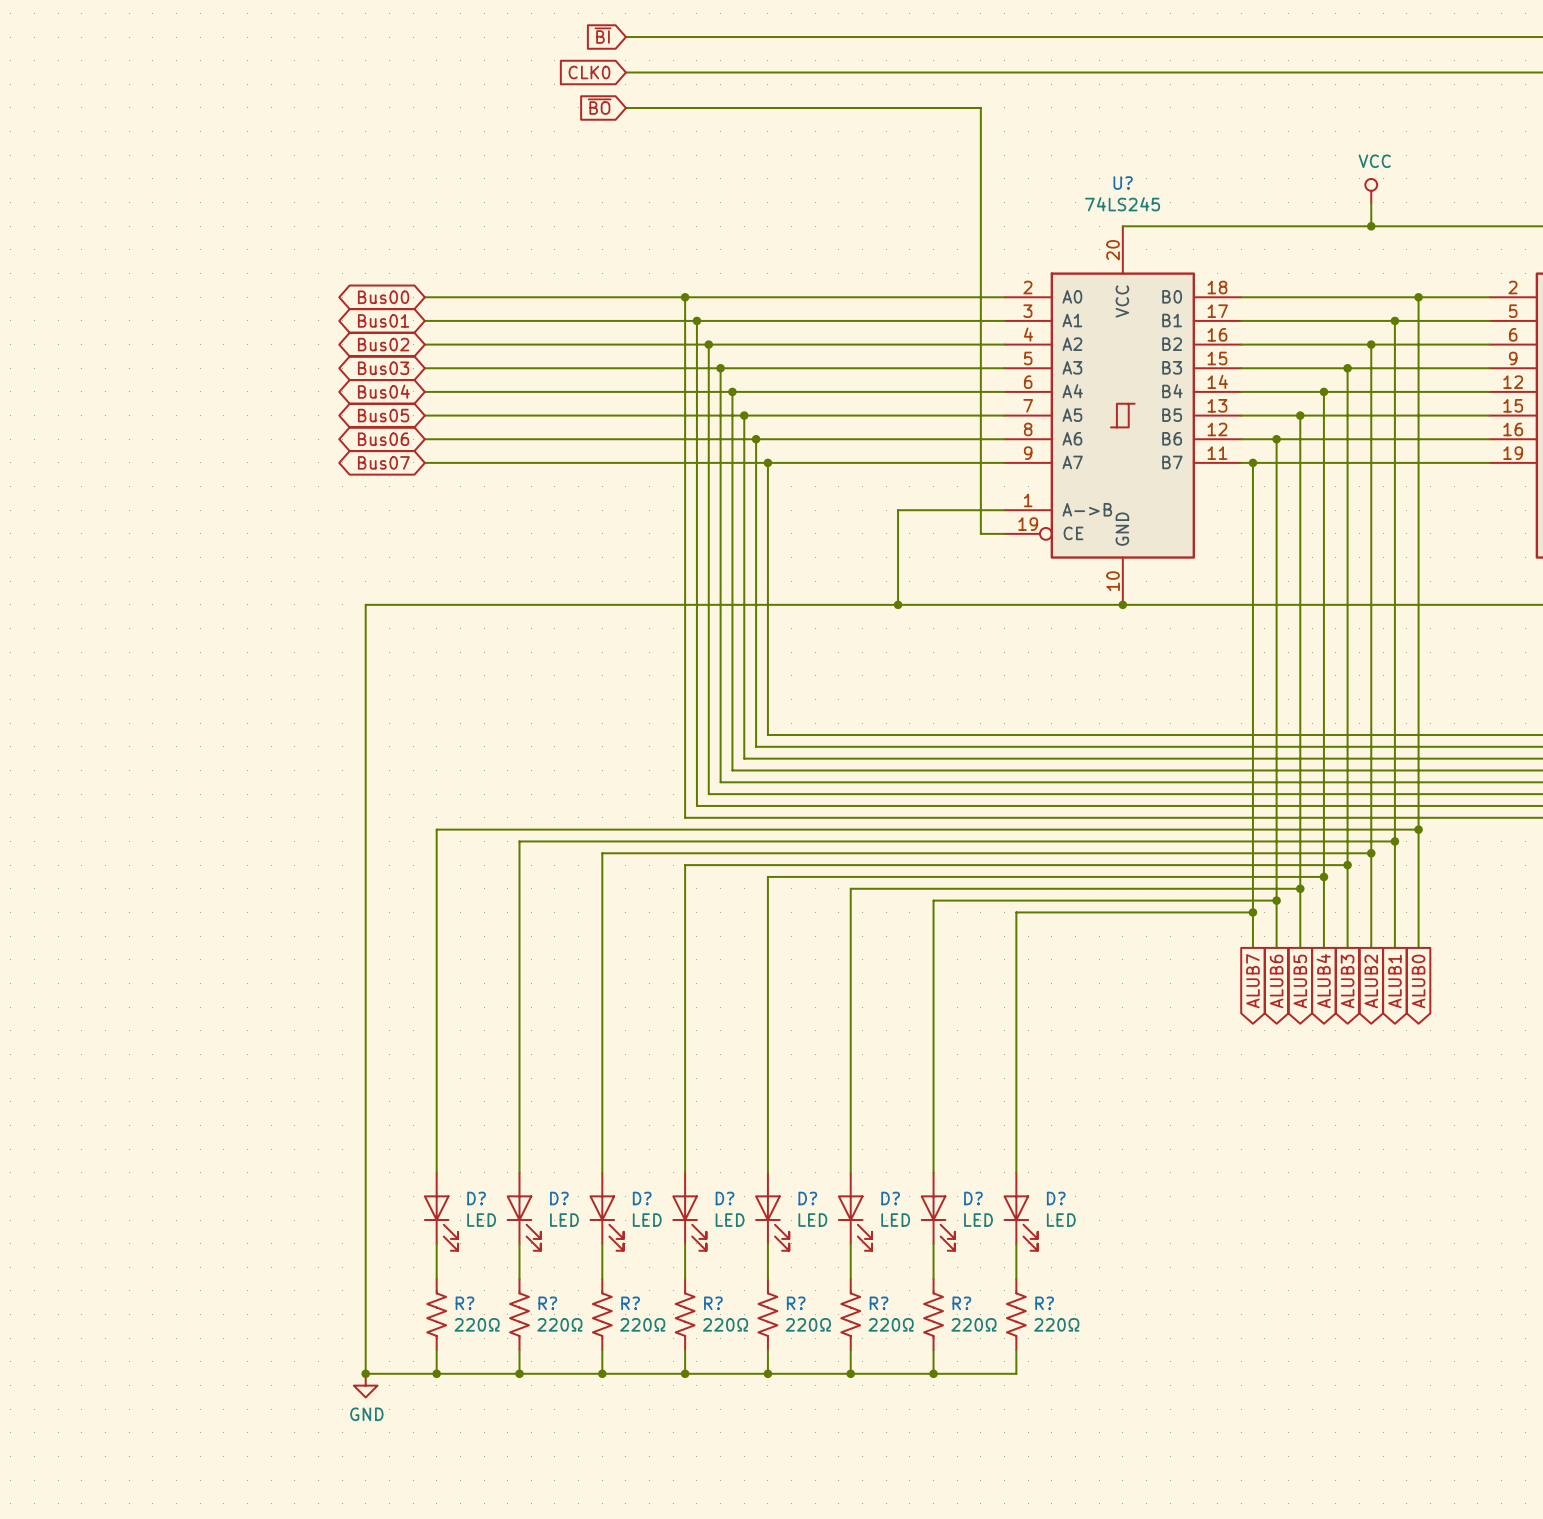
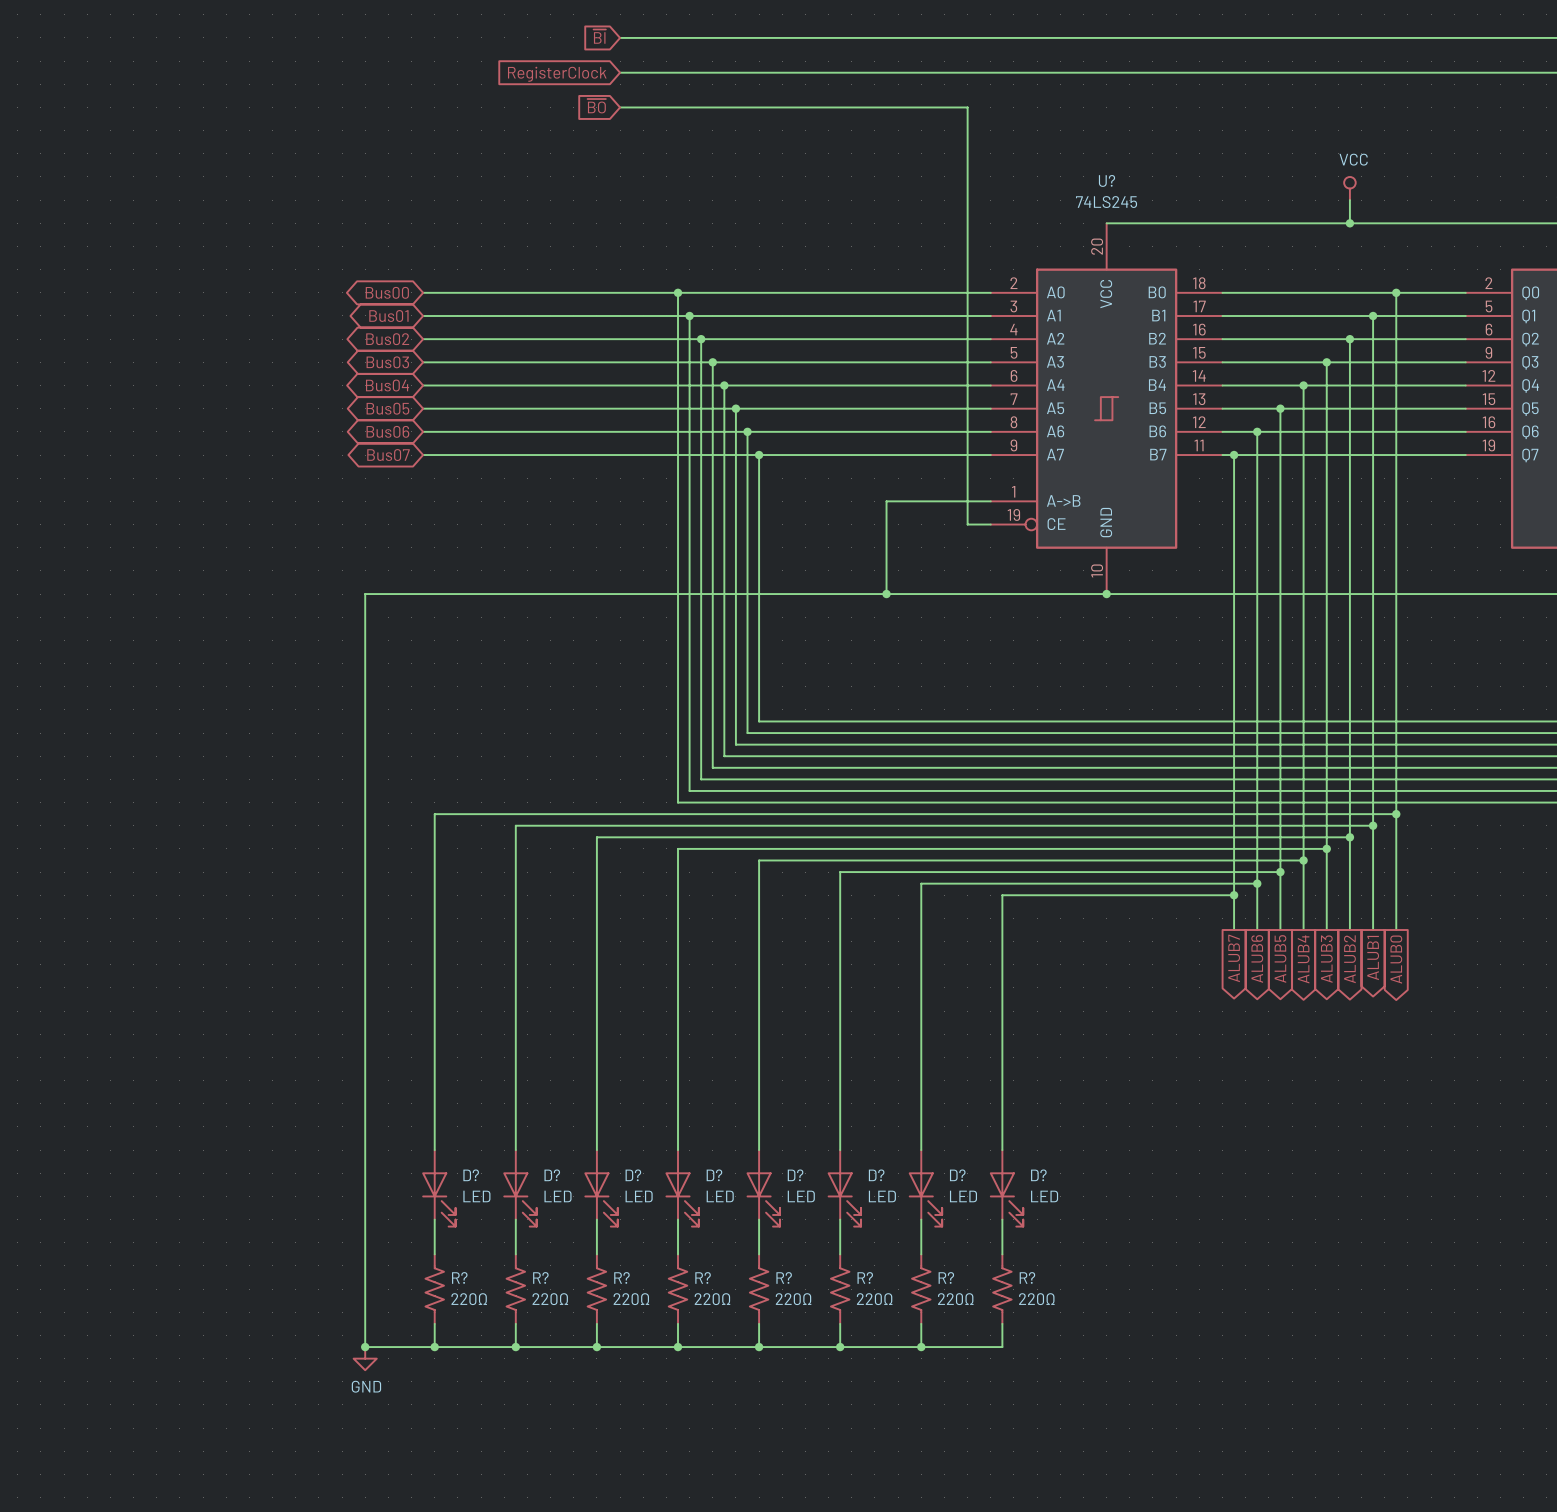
global label: CLK0 (589, 72) -> RegisterClock (557, 74)

